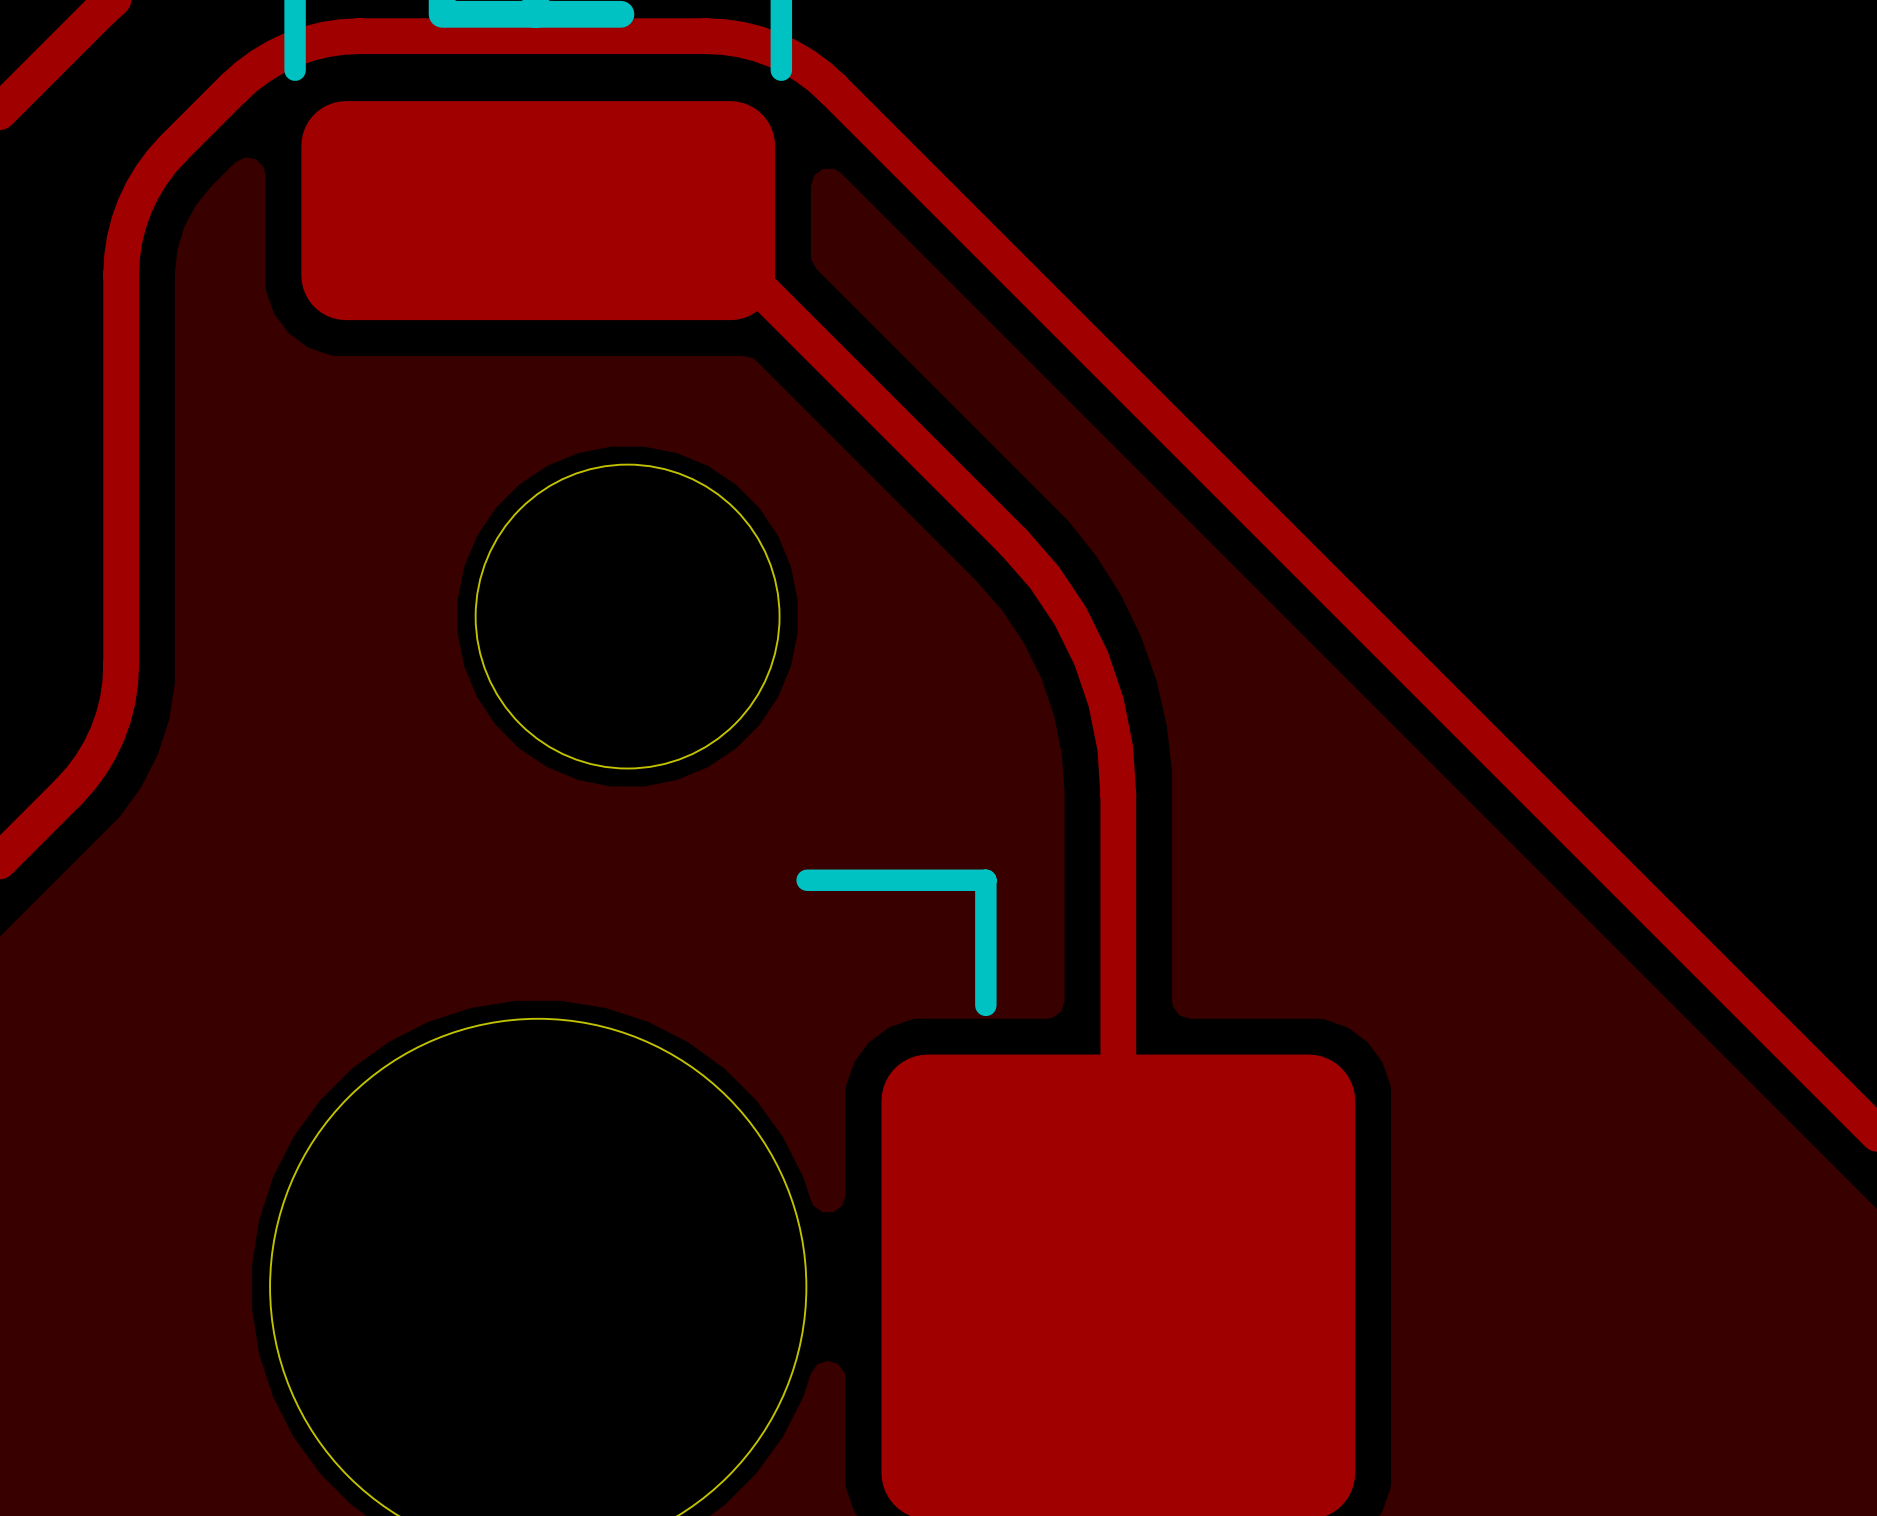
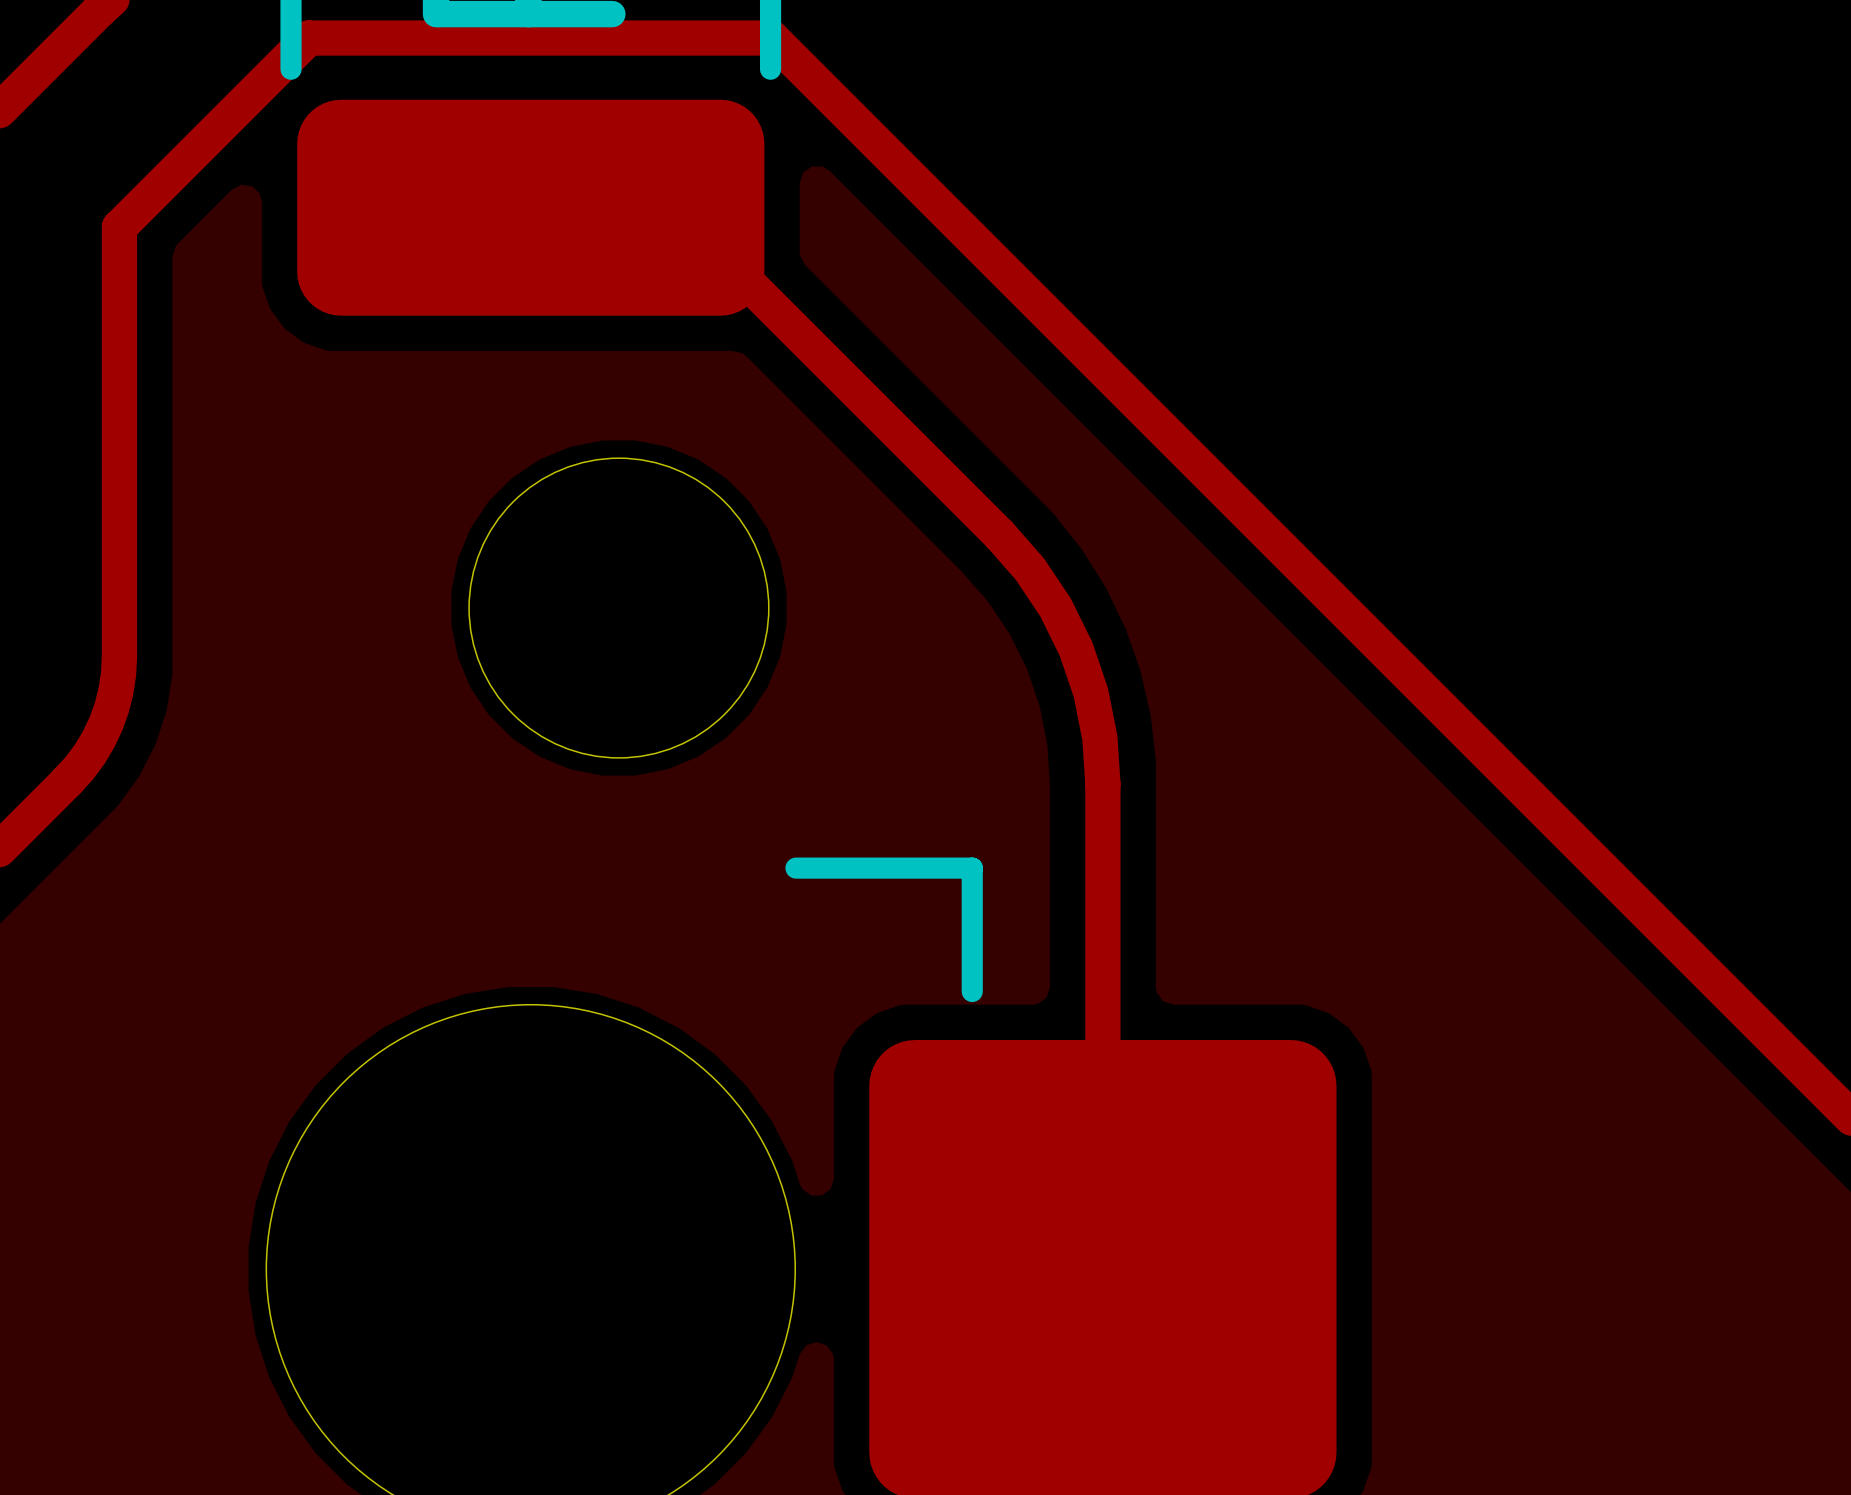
track: (832, 88) (805, 66) (790, 57) (757, 43) (723, 37) (359, 36) (324, 39) (307, 43) (275, 57) (246, 76) (161, 161) (151, 175) (134, 206) (124, 239) (121, 274) -> (820, 87) (771, 38) (308, 38) (119, 227) (119, 270)

